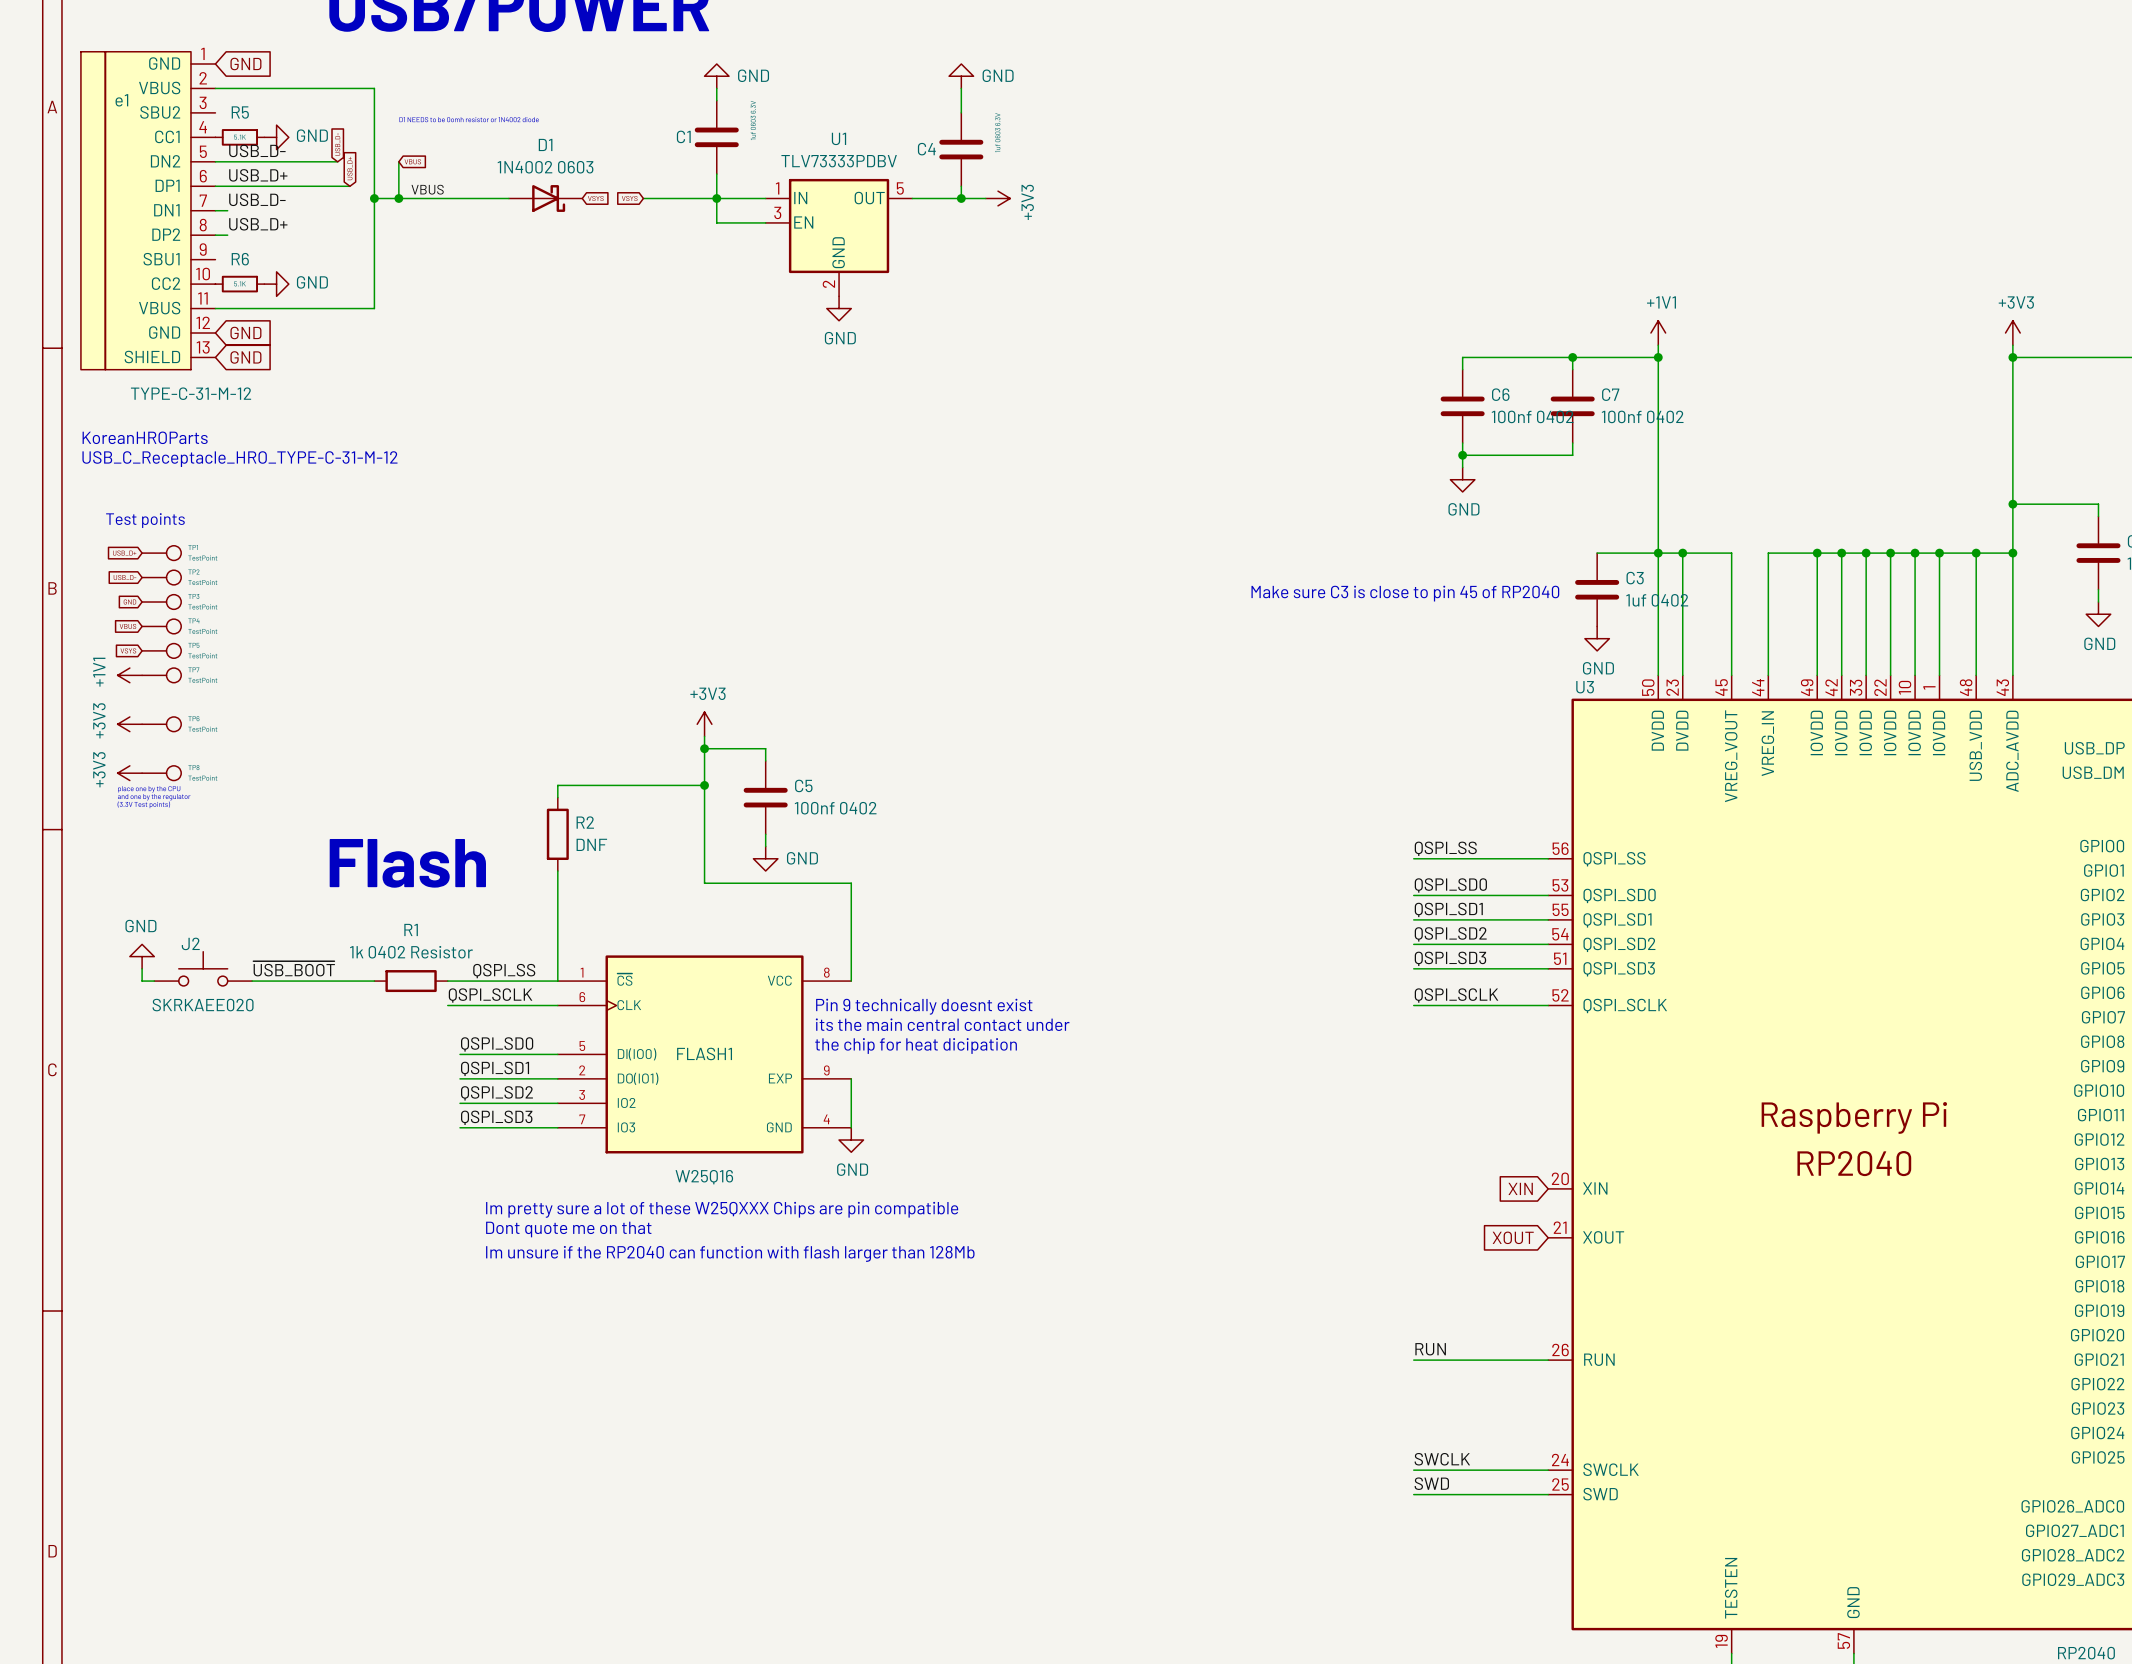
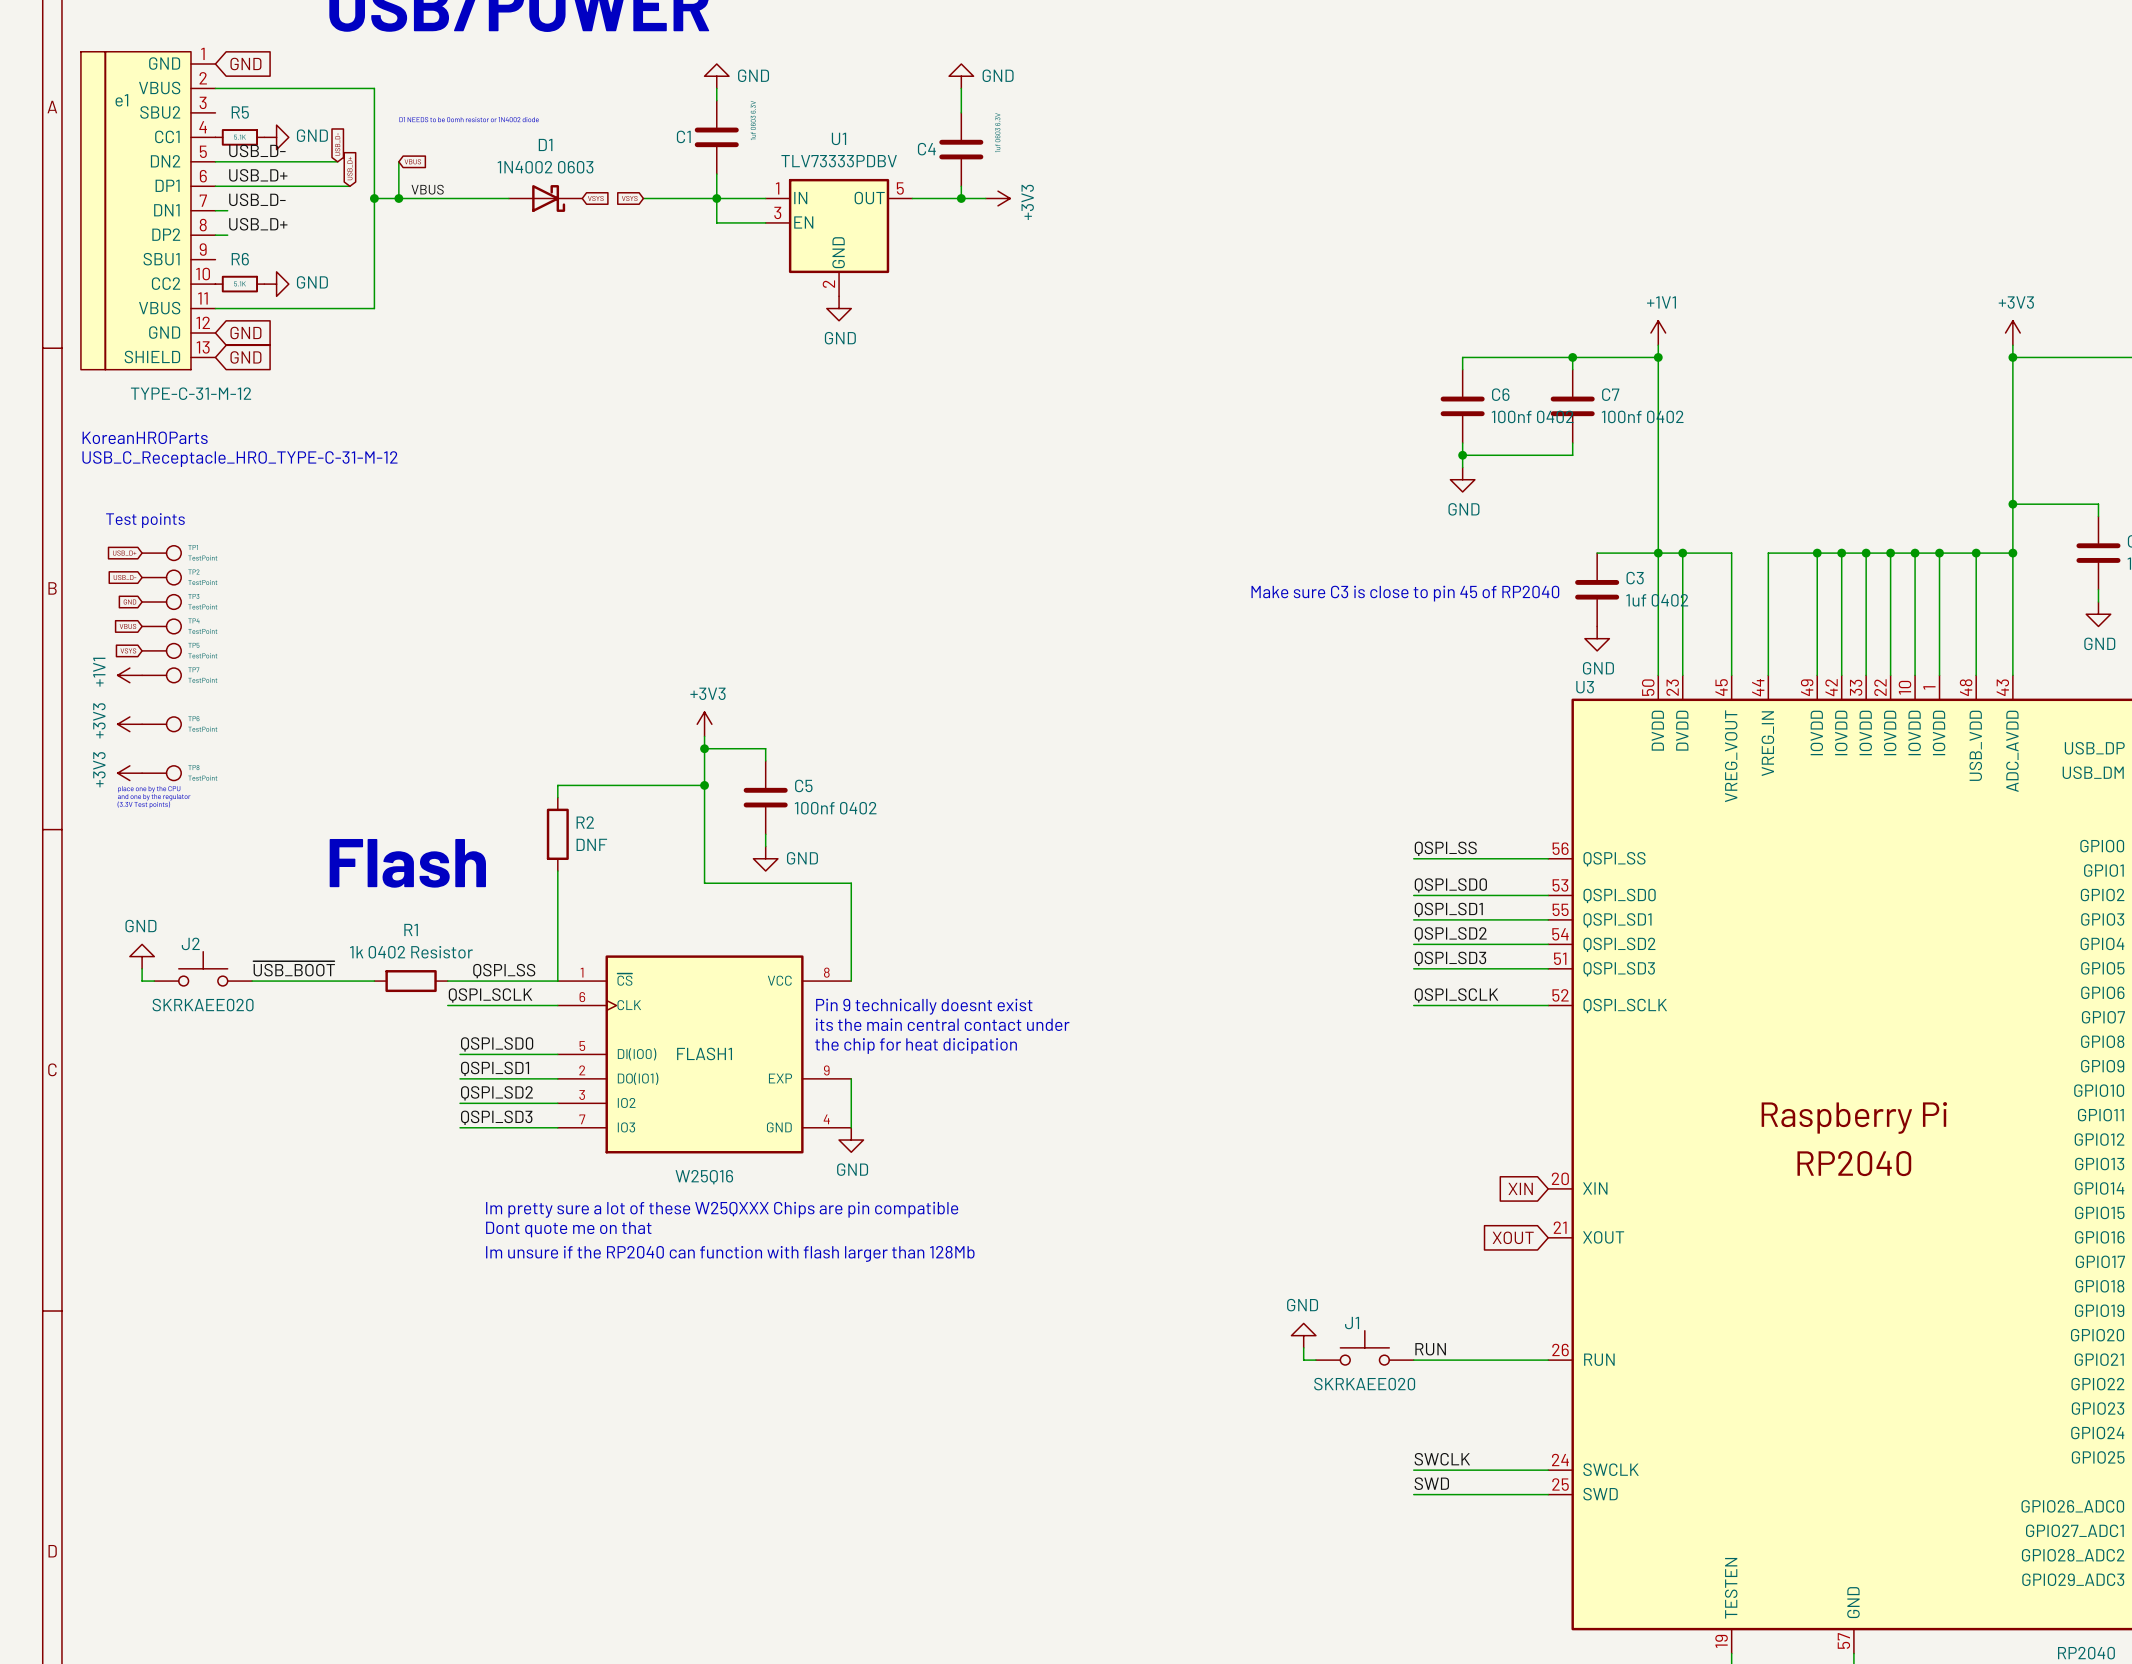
power symbol: none -> GND (1303, 1335)
wire: none -> (1303, 1347) (1303, 1360) (1315, 1360)
J1: none -> SKRKAEE020 (1364, 1347)

